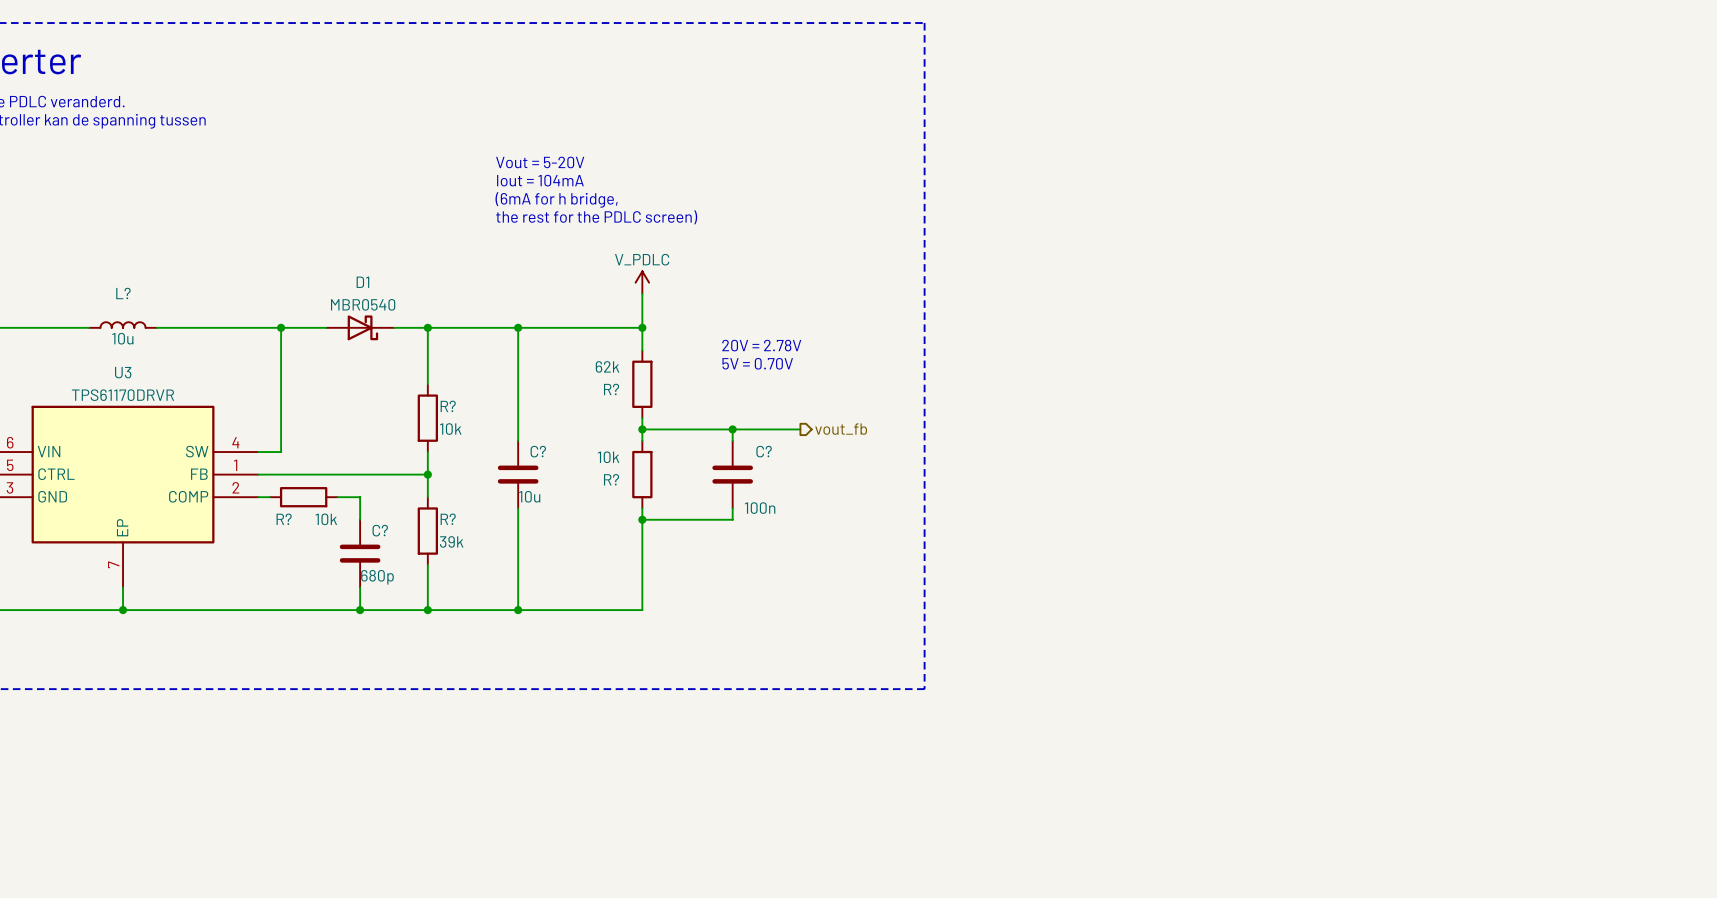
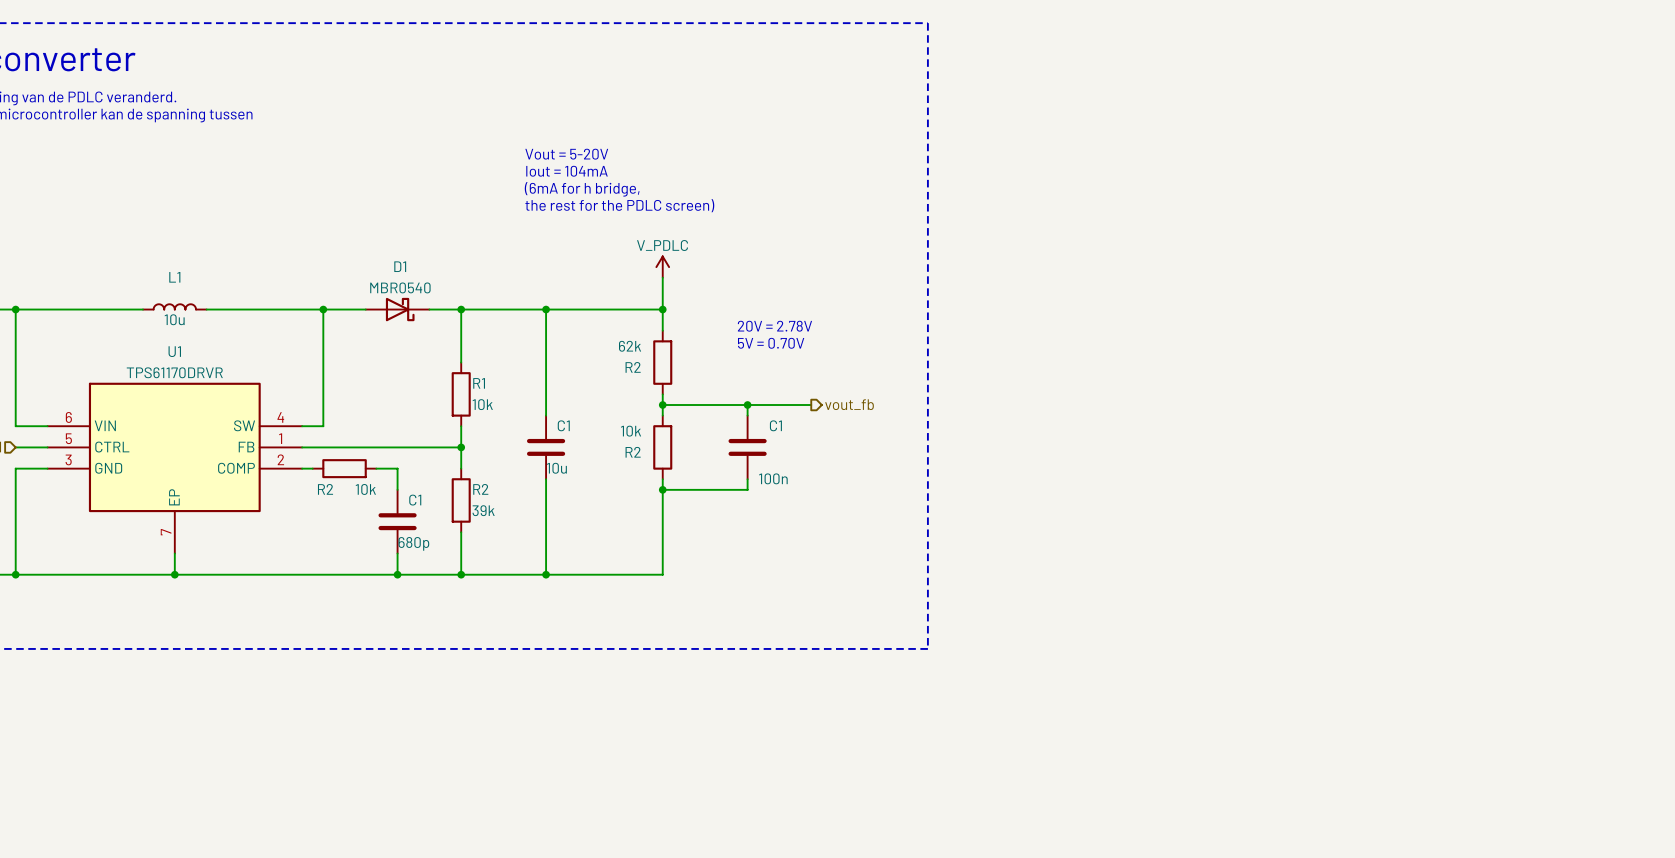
L? name: L? (123, 293) -> L1 (174, 277)
U3 name: U3 (123, 372) -> U1 (174, 351)
R? name: R? (611, 389) -> R2 (633, 367)
R? name: R? (448, 406) -> R1 (479, 383)
C? name: C? (538, 451) -> C1 (563, 425)
C? name: C? (764, 451) -> C1 (775, 425)
R? name: R? (611, 479) -> R2 (633, 452)
R? name: R? (284, 519) -> R2 (325, 489)
R? name: R? (448, 519) -> R2 (480, 489)
C? name: C? (380, 530) -> C1 (415, 500)

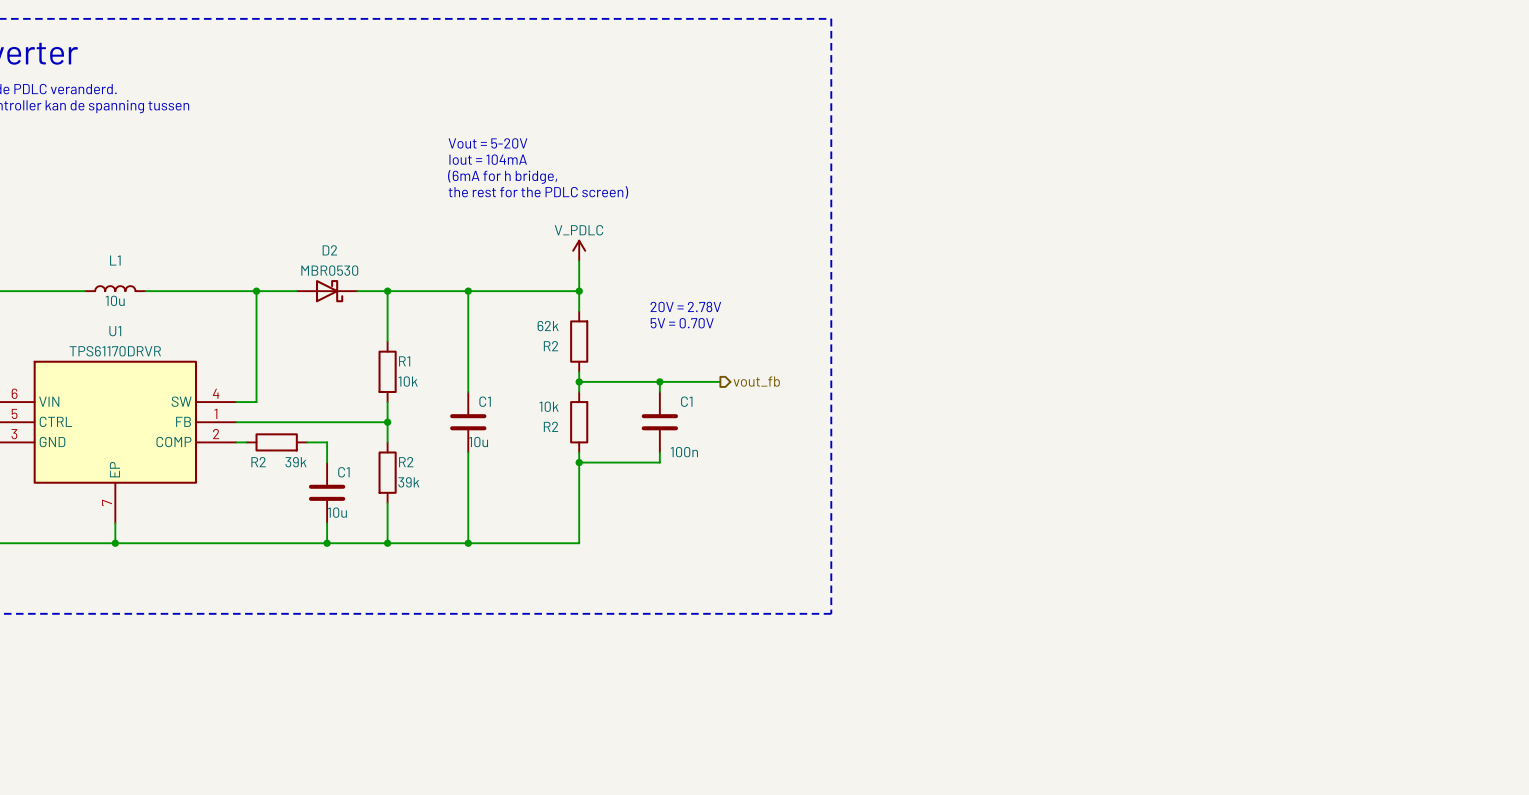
D1 name: D1 (400, 266) -> D2 (329, 250)
D1 value: MBR0540 (400, 287) -> MBR0530 (329, 270)
R2 value: 10k (365, 489) -> 39k (296, 462)
C1 value: 680p (413, 543) -> 10u (337, 512)

